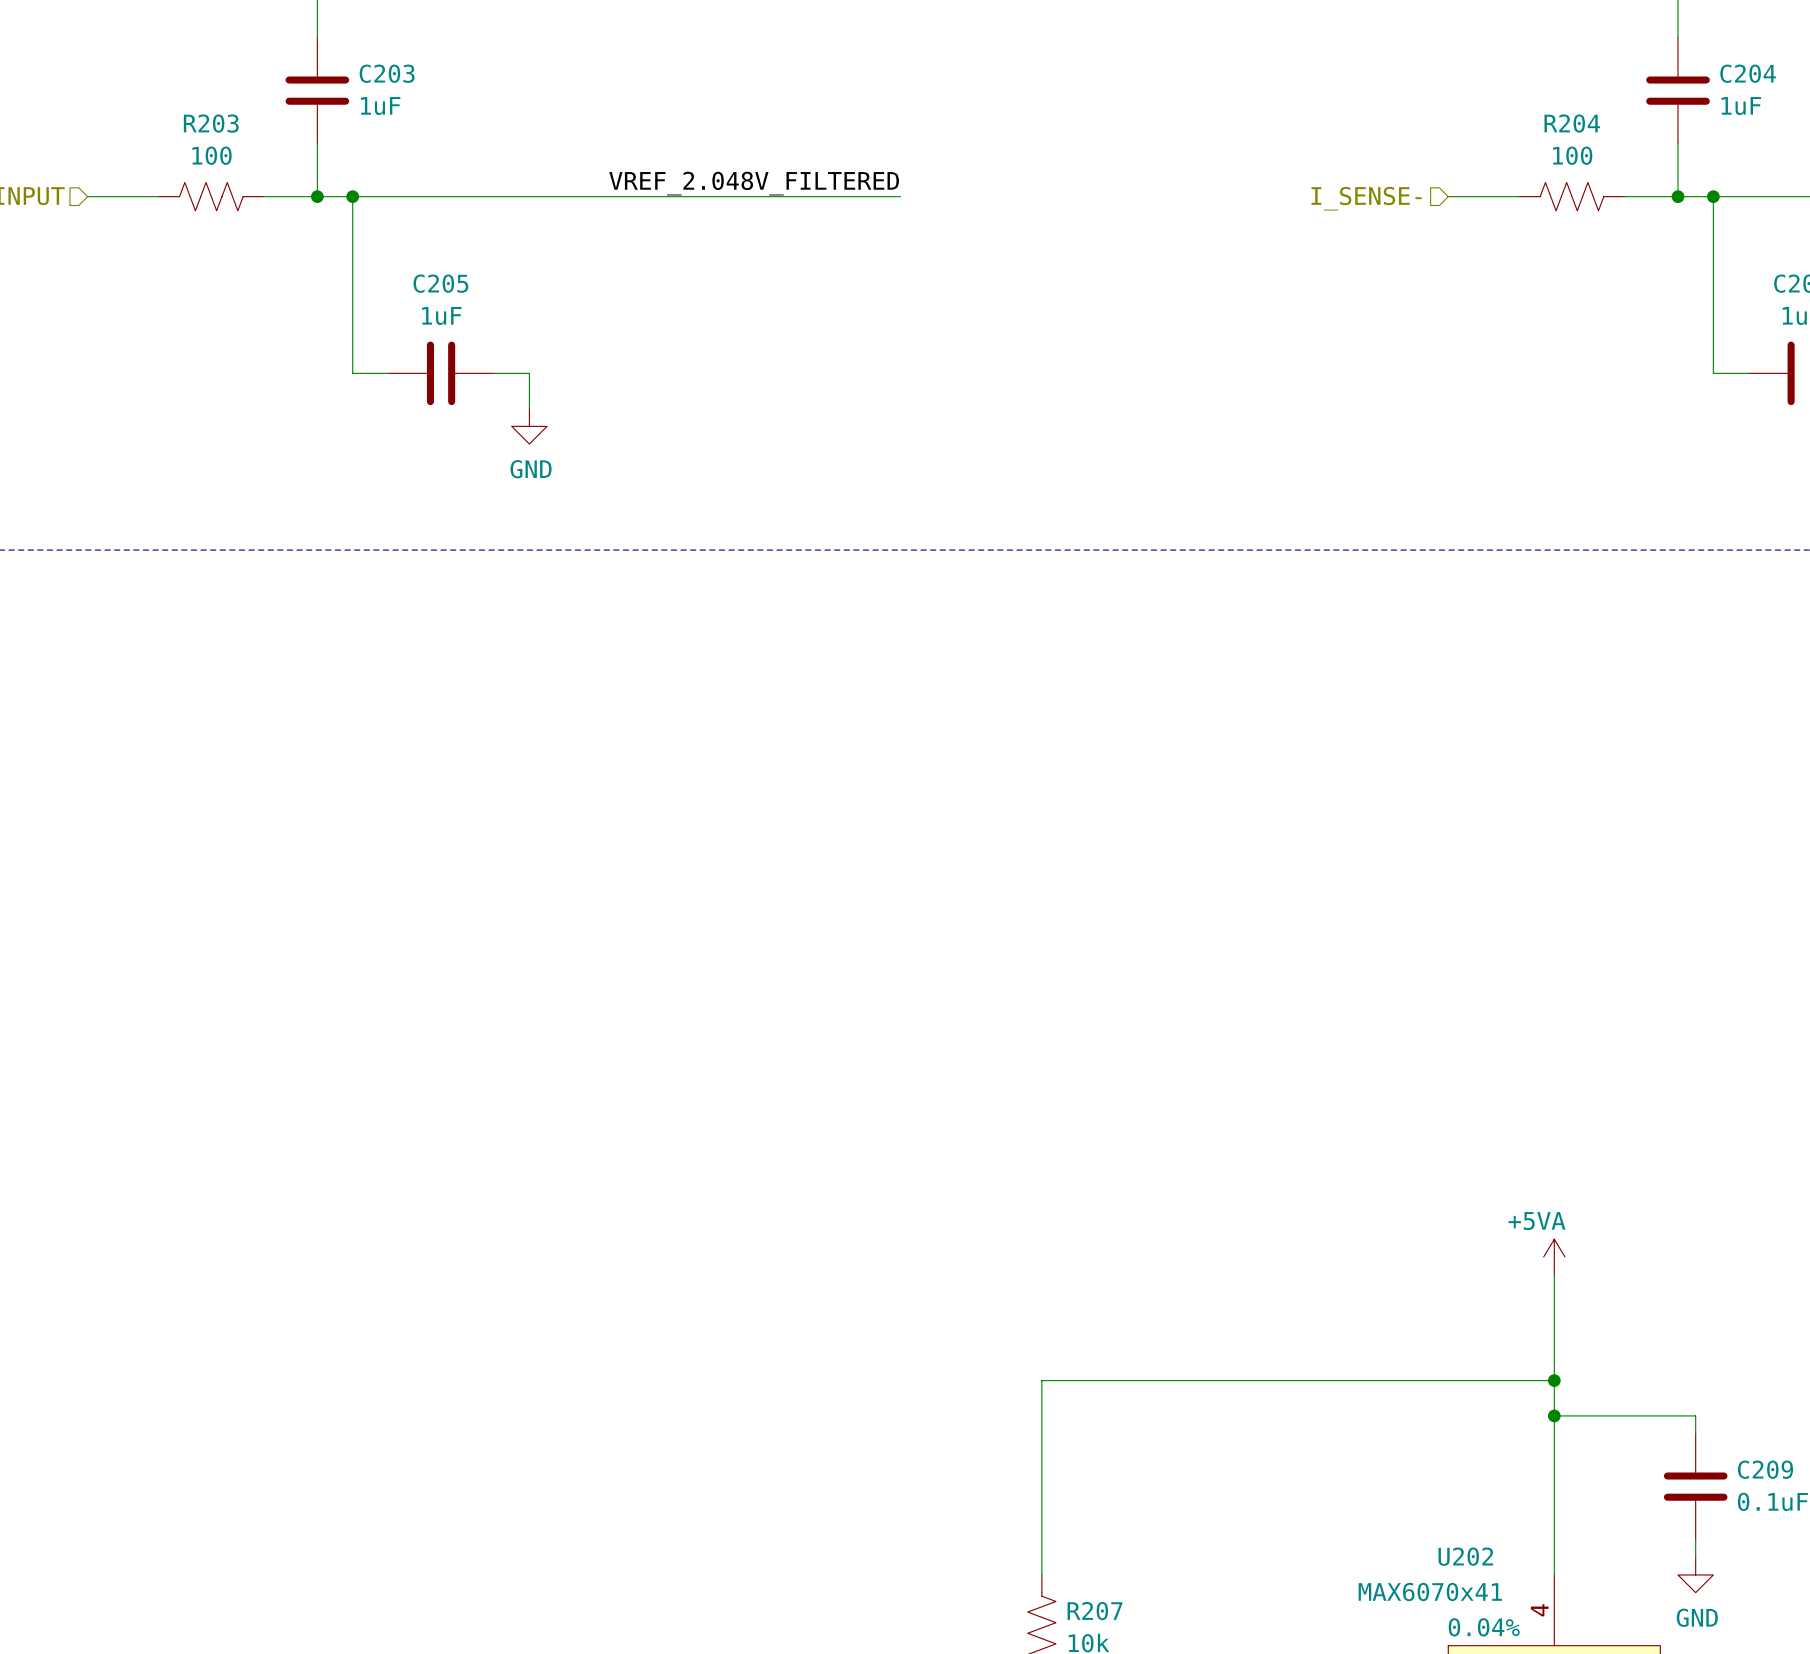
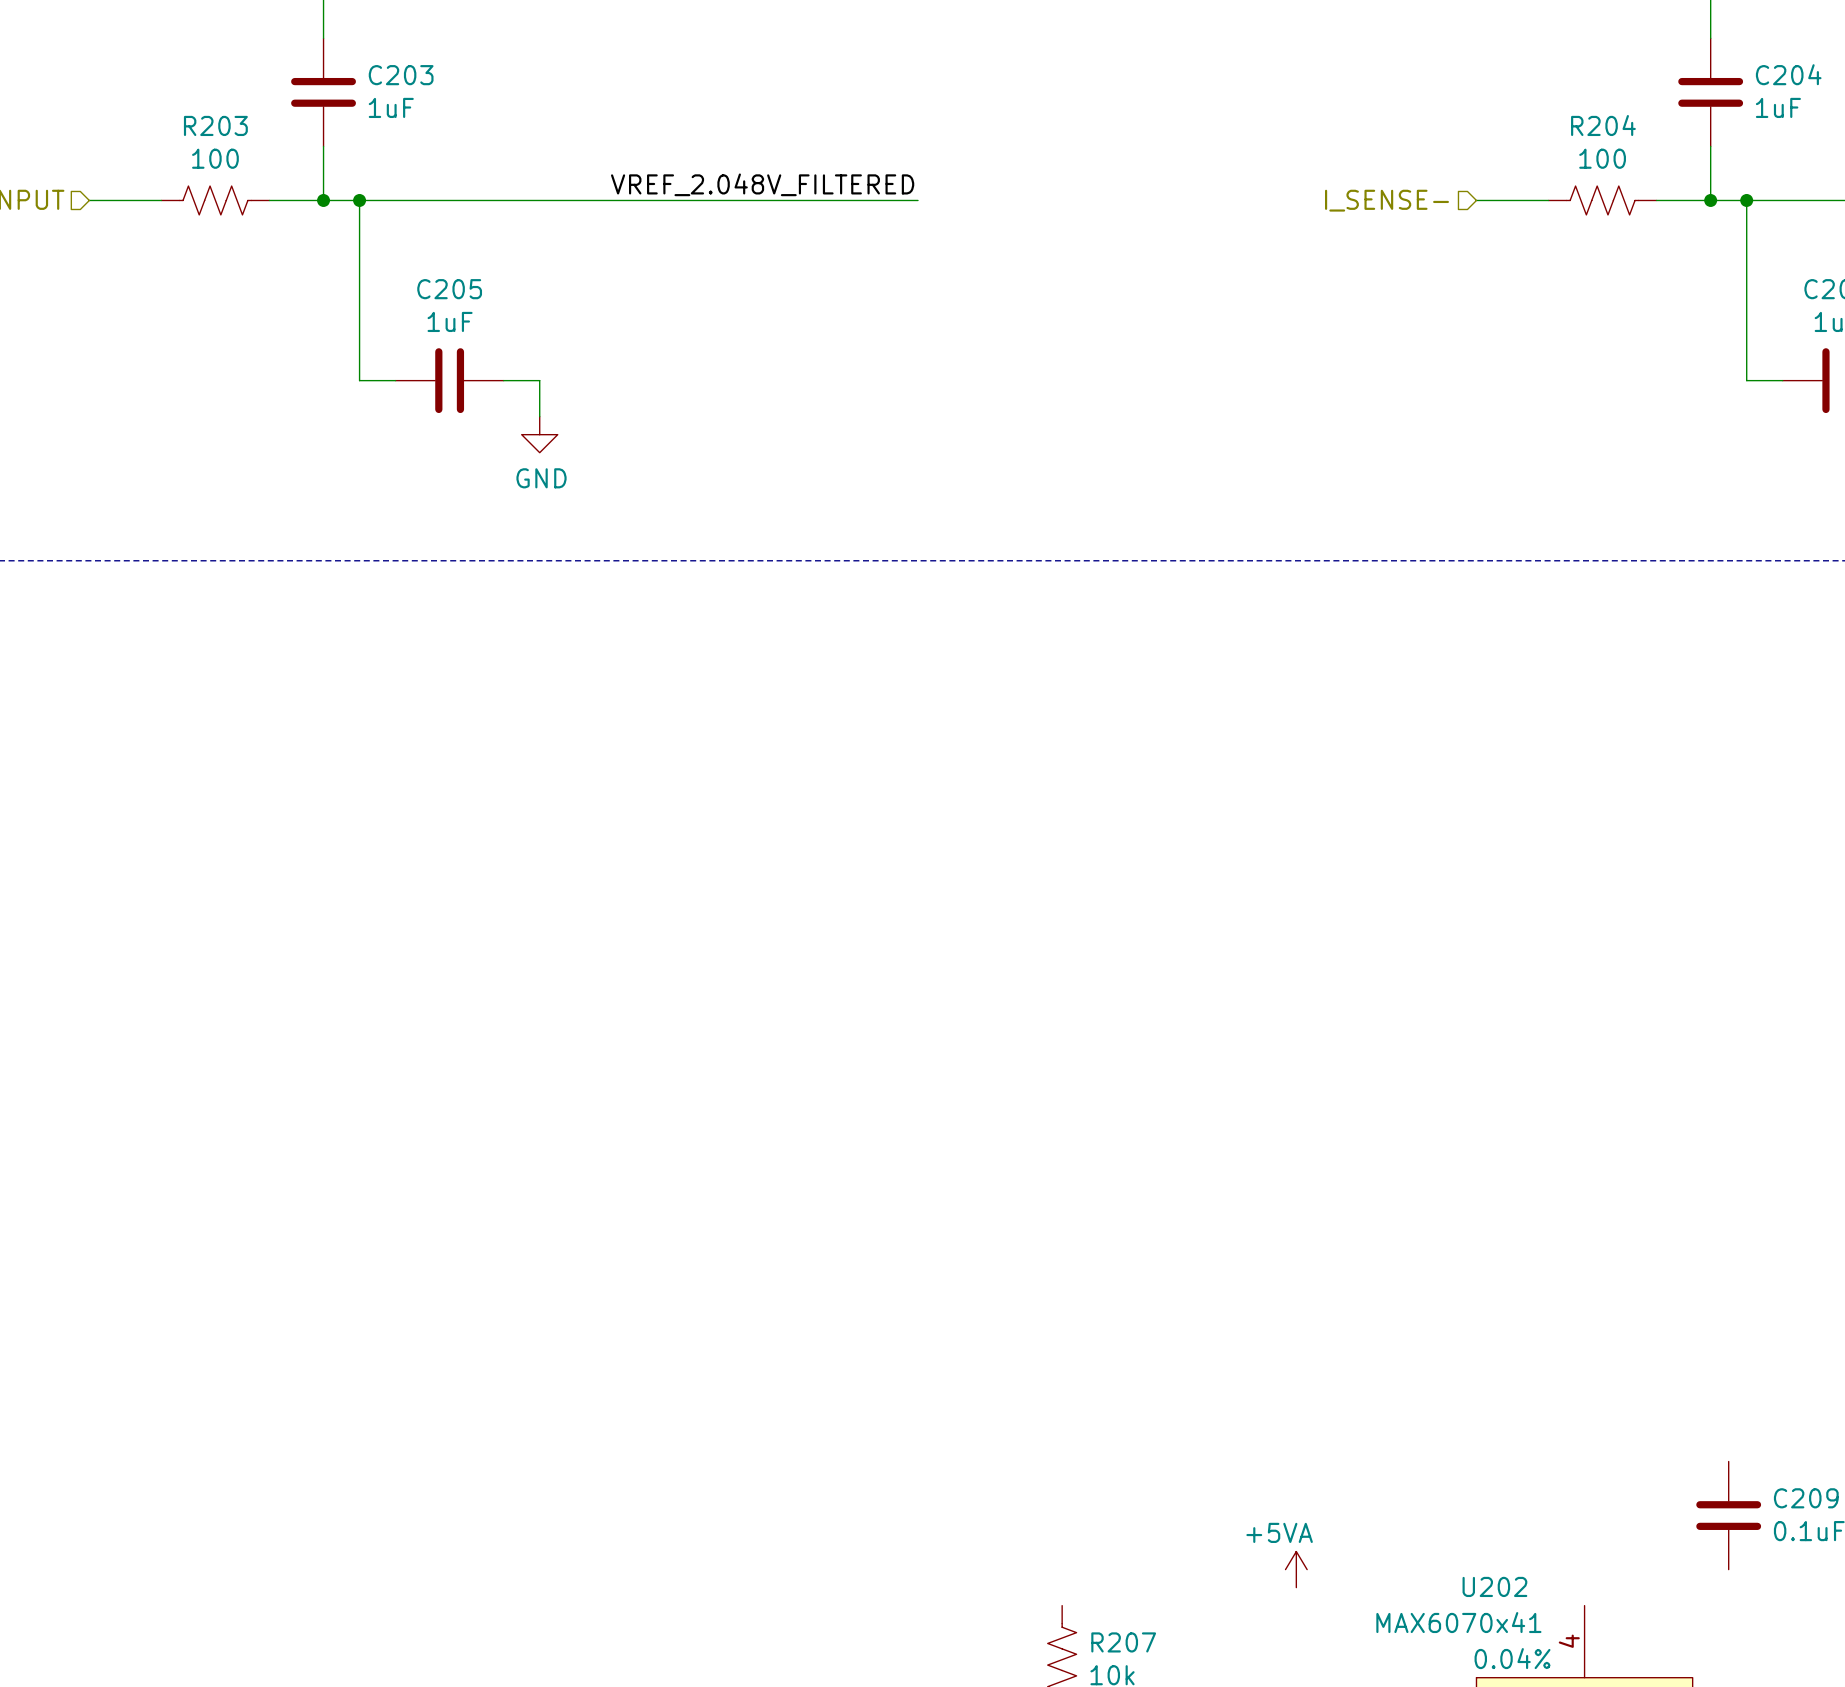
power symbol: +5VA (1554, 1256) -> none
wire: (1554, 1274) (1554, 1574) -> none
wire: (1554, 1380) (1041, 1380) (1041, 1574) -> none
junction: (1554, 1380) -> none
wire: (1554, 1415) (1695, 1415) (1695, 1433) -> none
junction: (1554, 1415) -> none
power symbol: none -> +5VA (1296, 1569)
wire: (1695, 1539) (1695, 1557) -> none
power symbol: GND (1695, 1574) -> none

